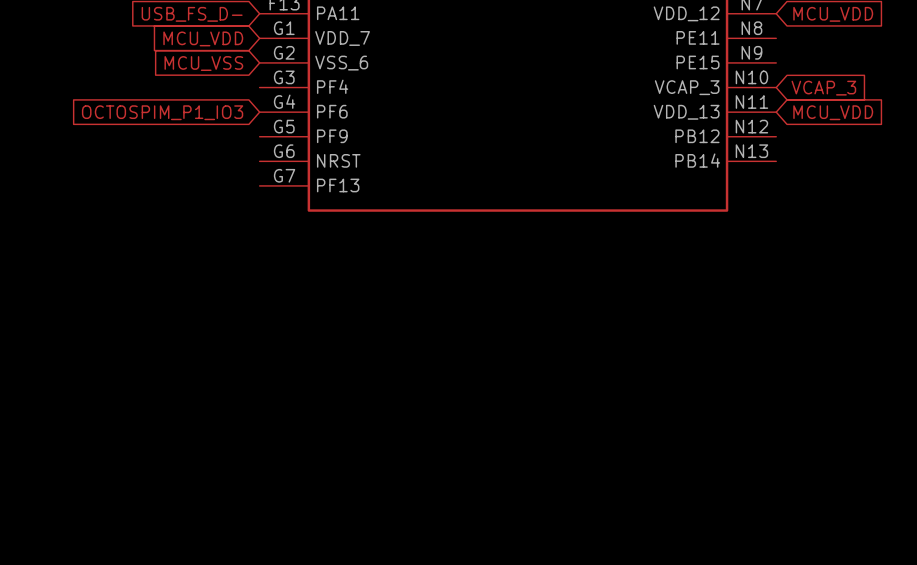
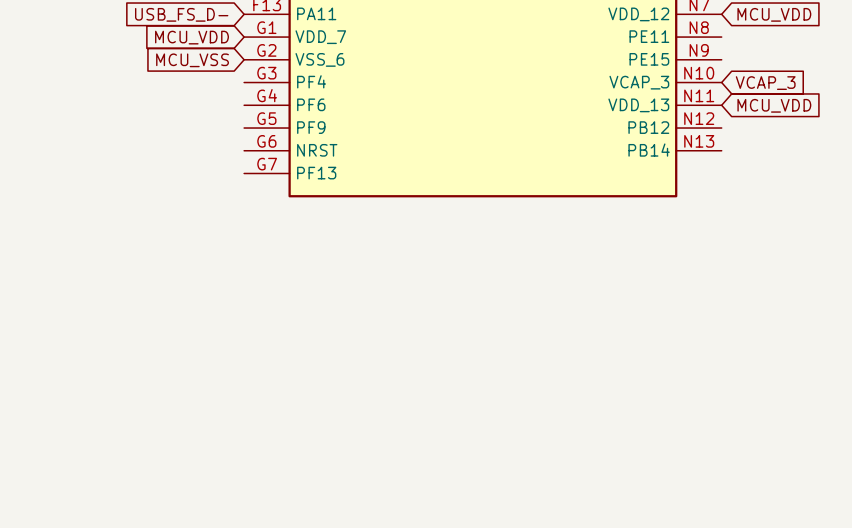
global label: OCTOSPIM_P1_IO3 (162, 112) -> none

